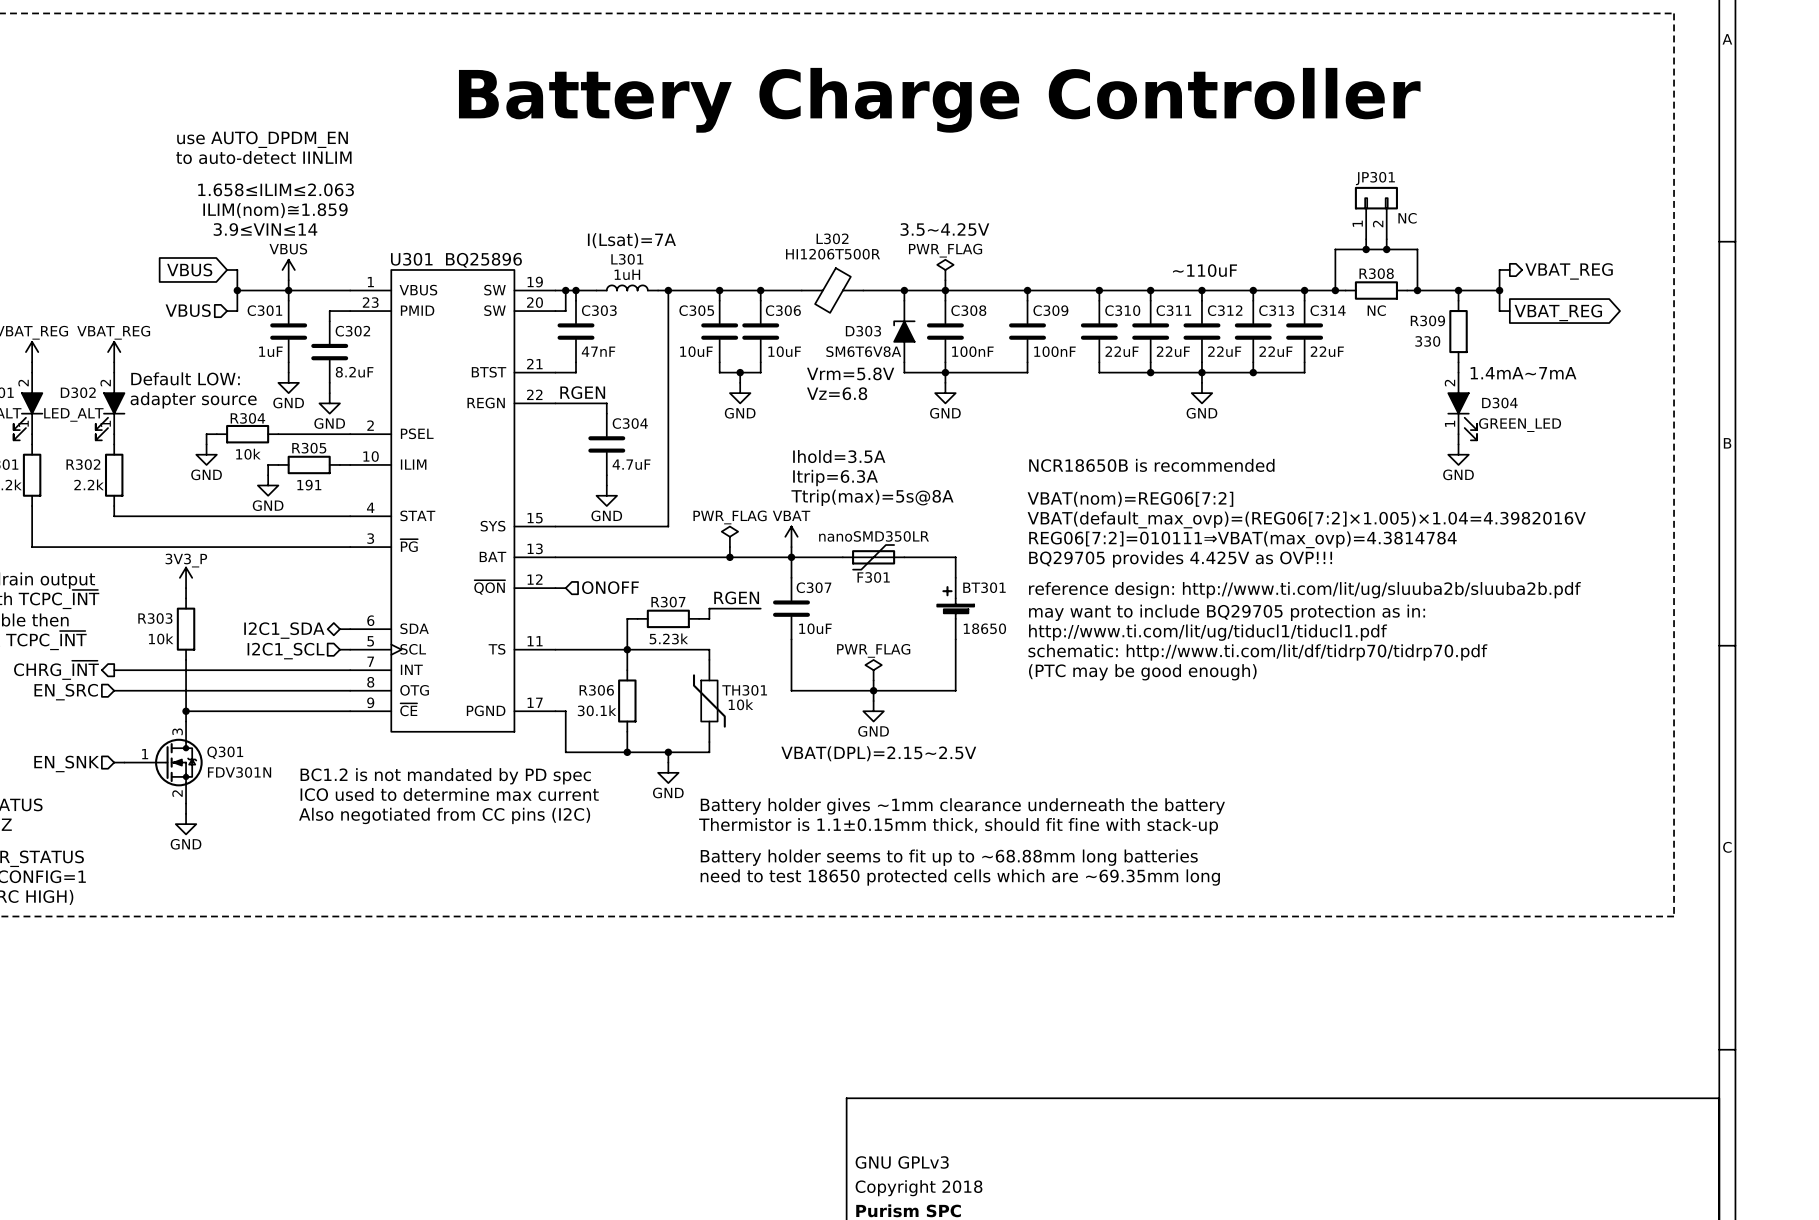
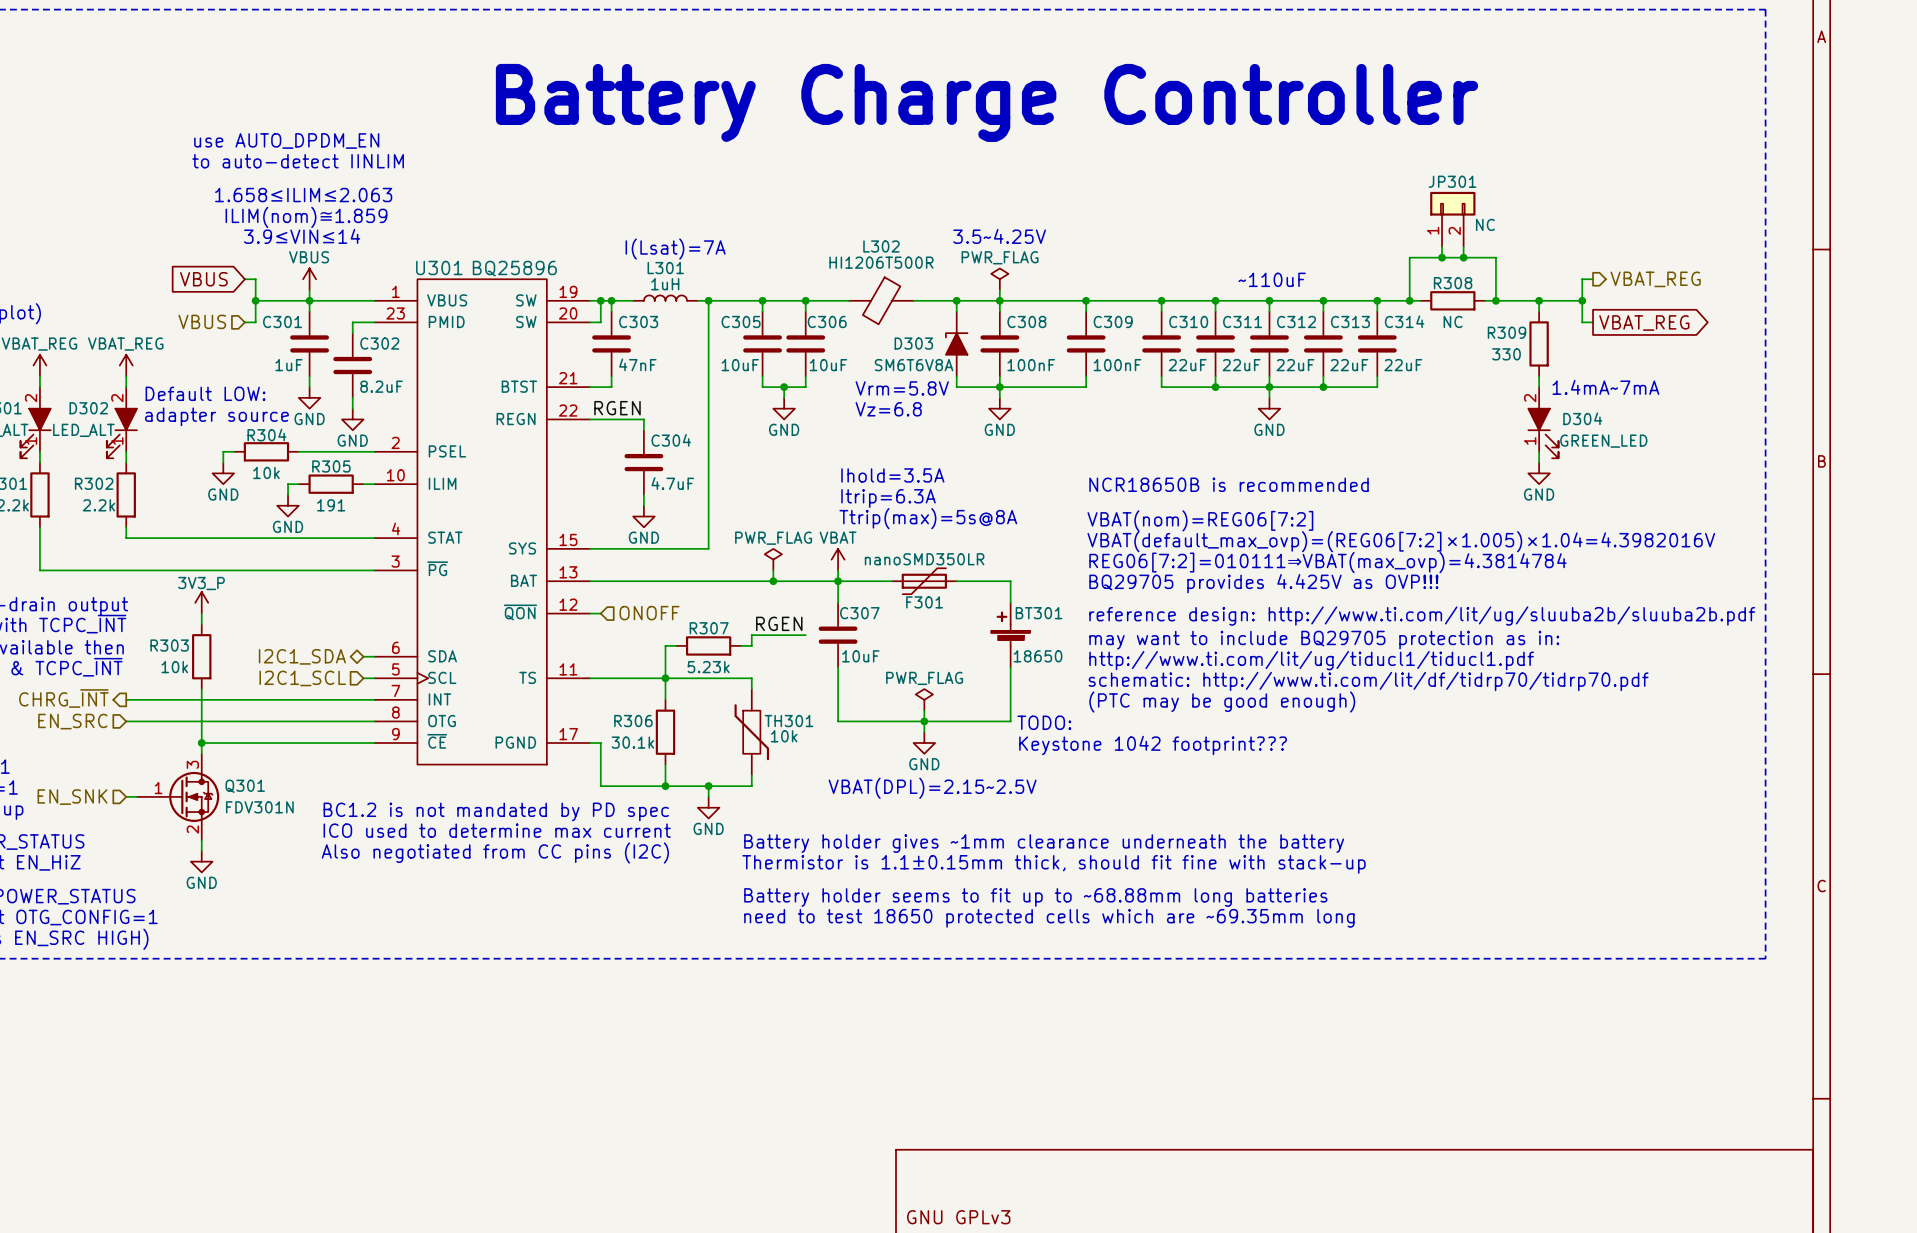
text: none -> TODO: (1044, 722)
text: none -> Keystone 1042 footprint??? (1153, 745)

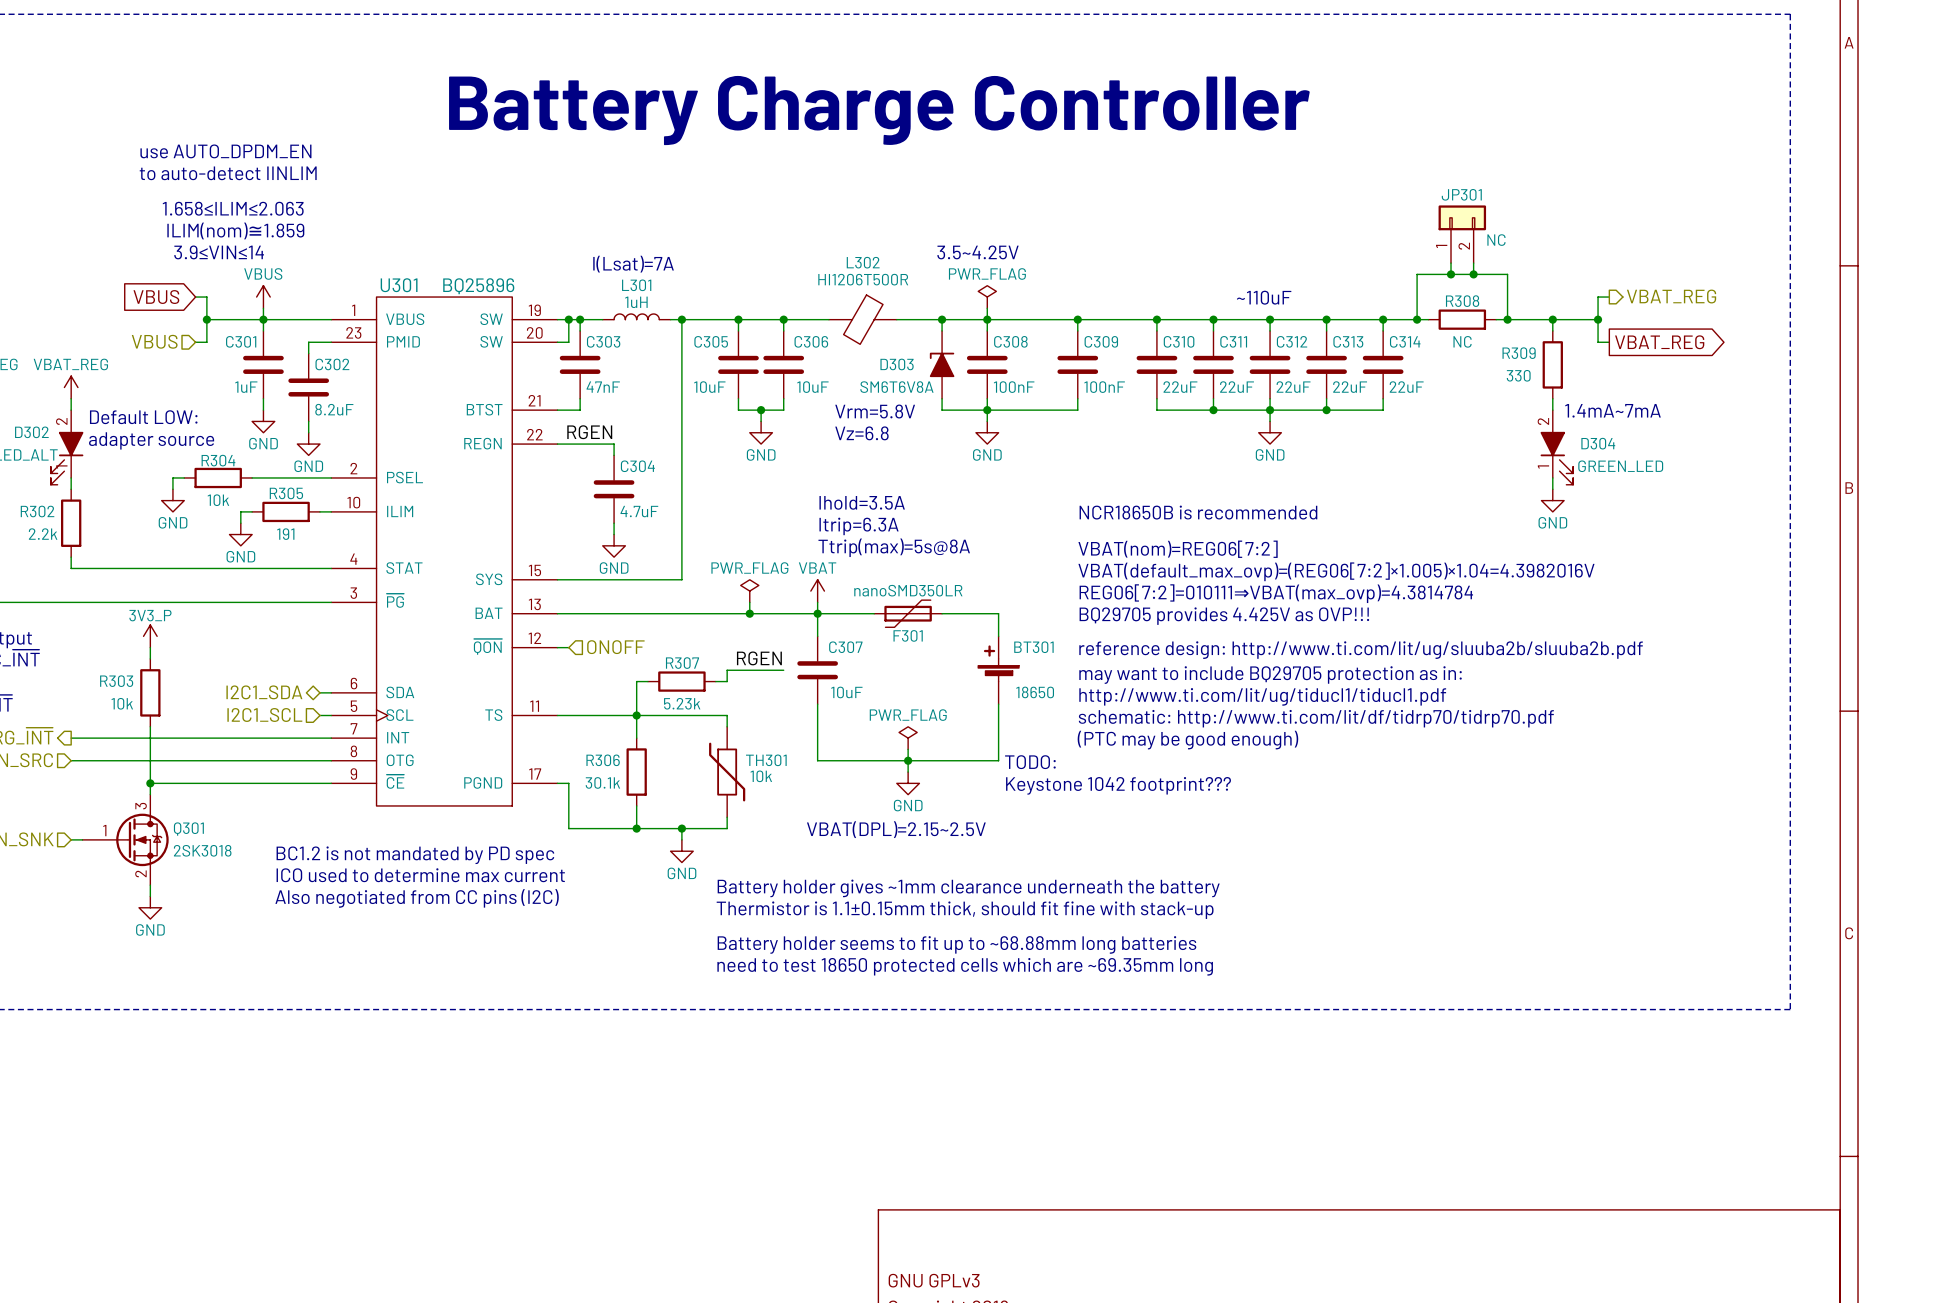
Q301 value: FDV301N (259, 807) -> 2SK3018 (202, 850)

